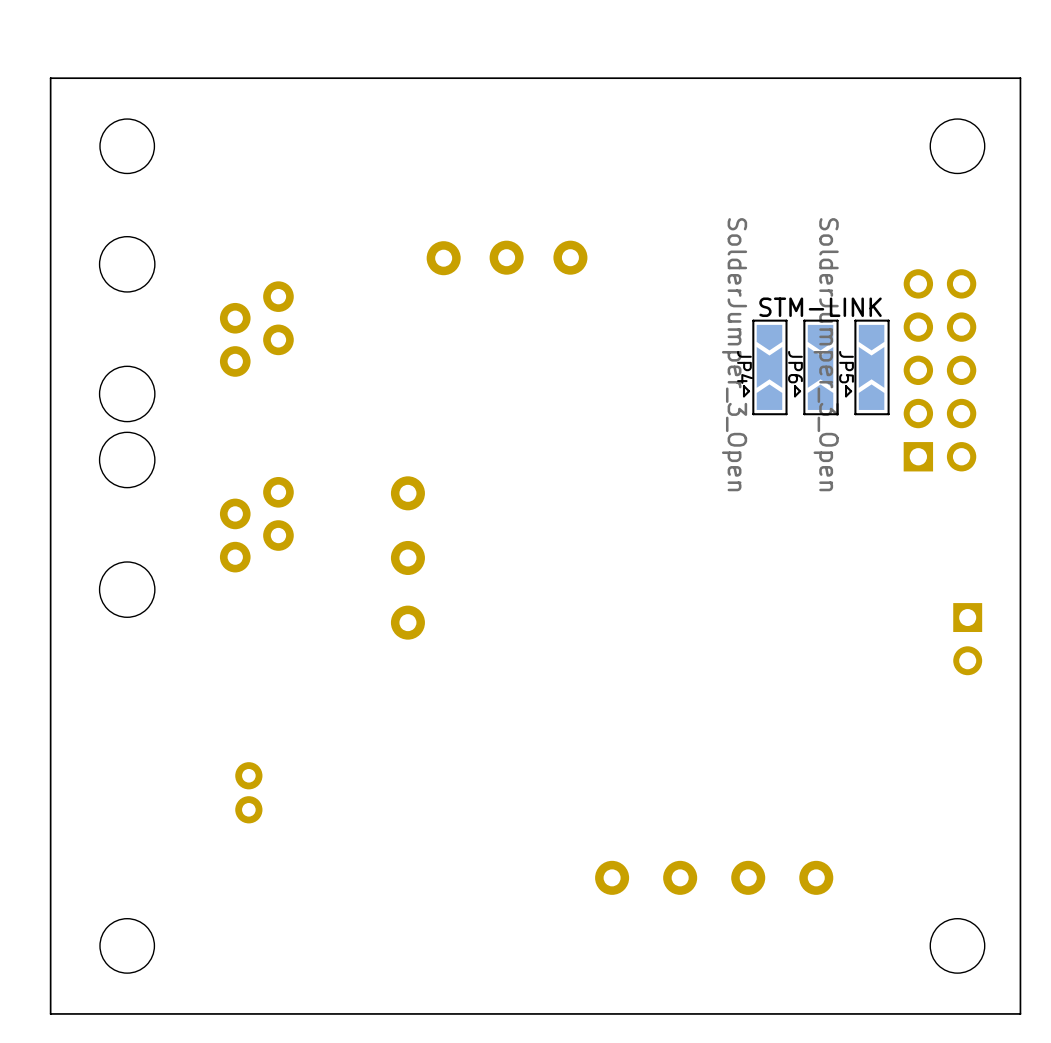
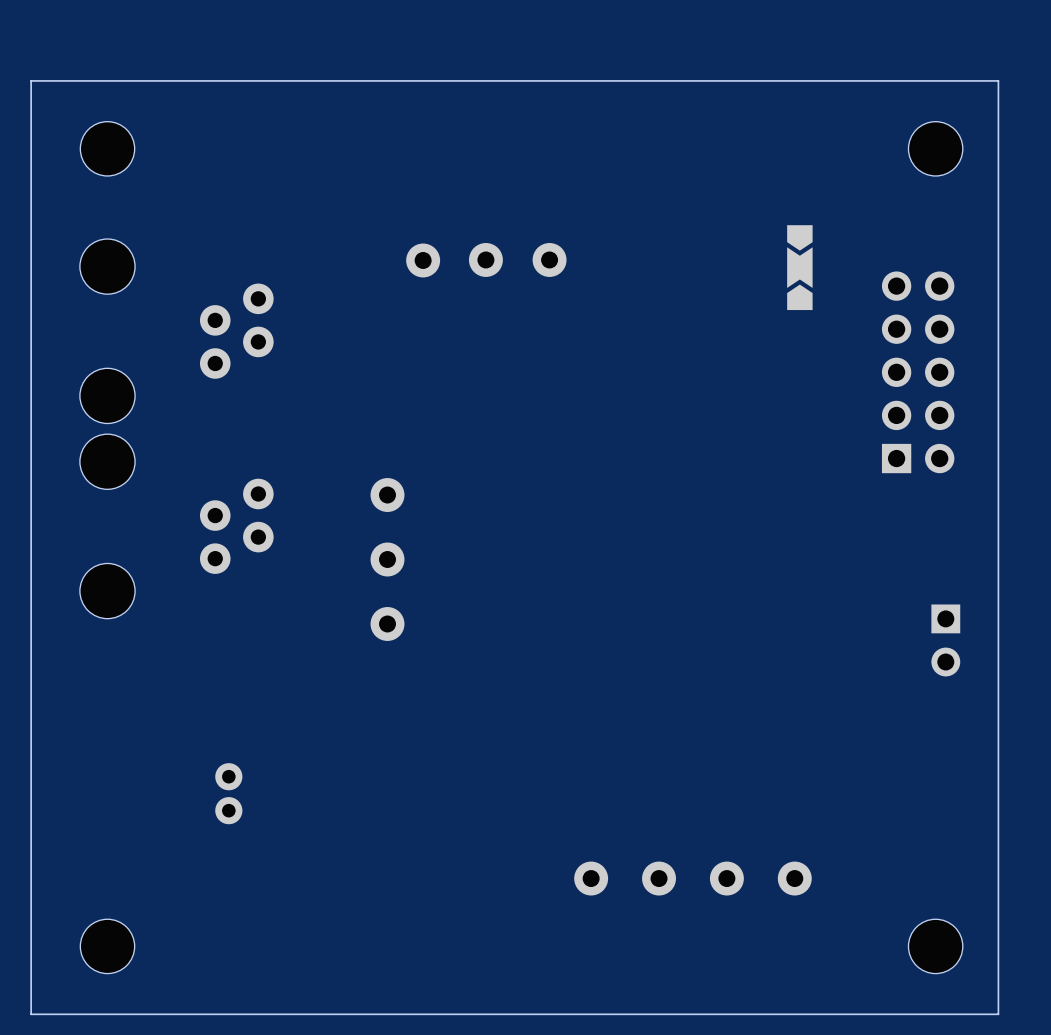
part: none -> (799, 267)
text: STM-LINK (820, 307) -> none
JP4: SolderJumper_3_Open (765, 367) -> none
JP6: (816, 367) -> none
JP5: SolderJumper_3_Open (867, 367) -> none

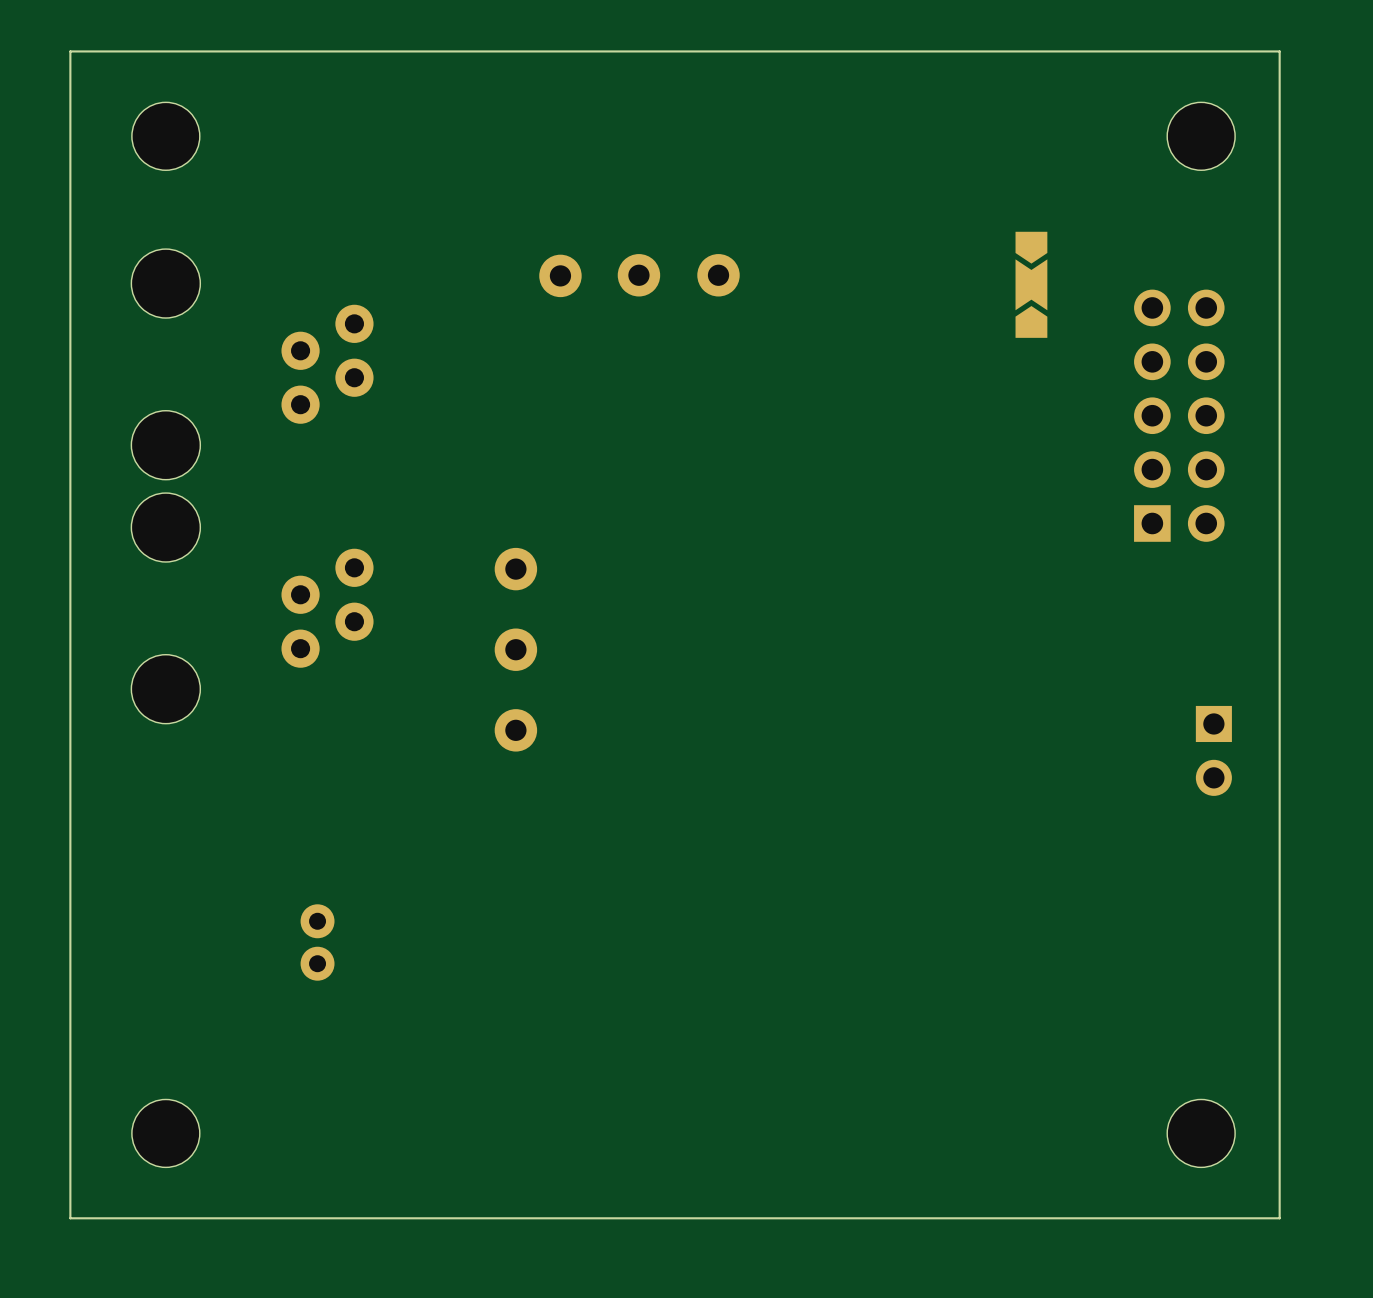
part: (591, 878) -> none
part: (659, 878) -> none
part: (726, 878) -> none
part: (794, 878) -> none

